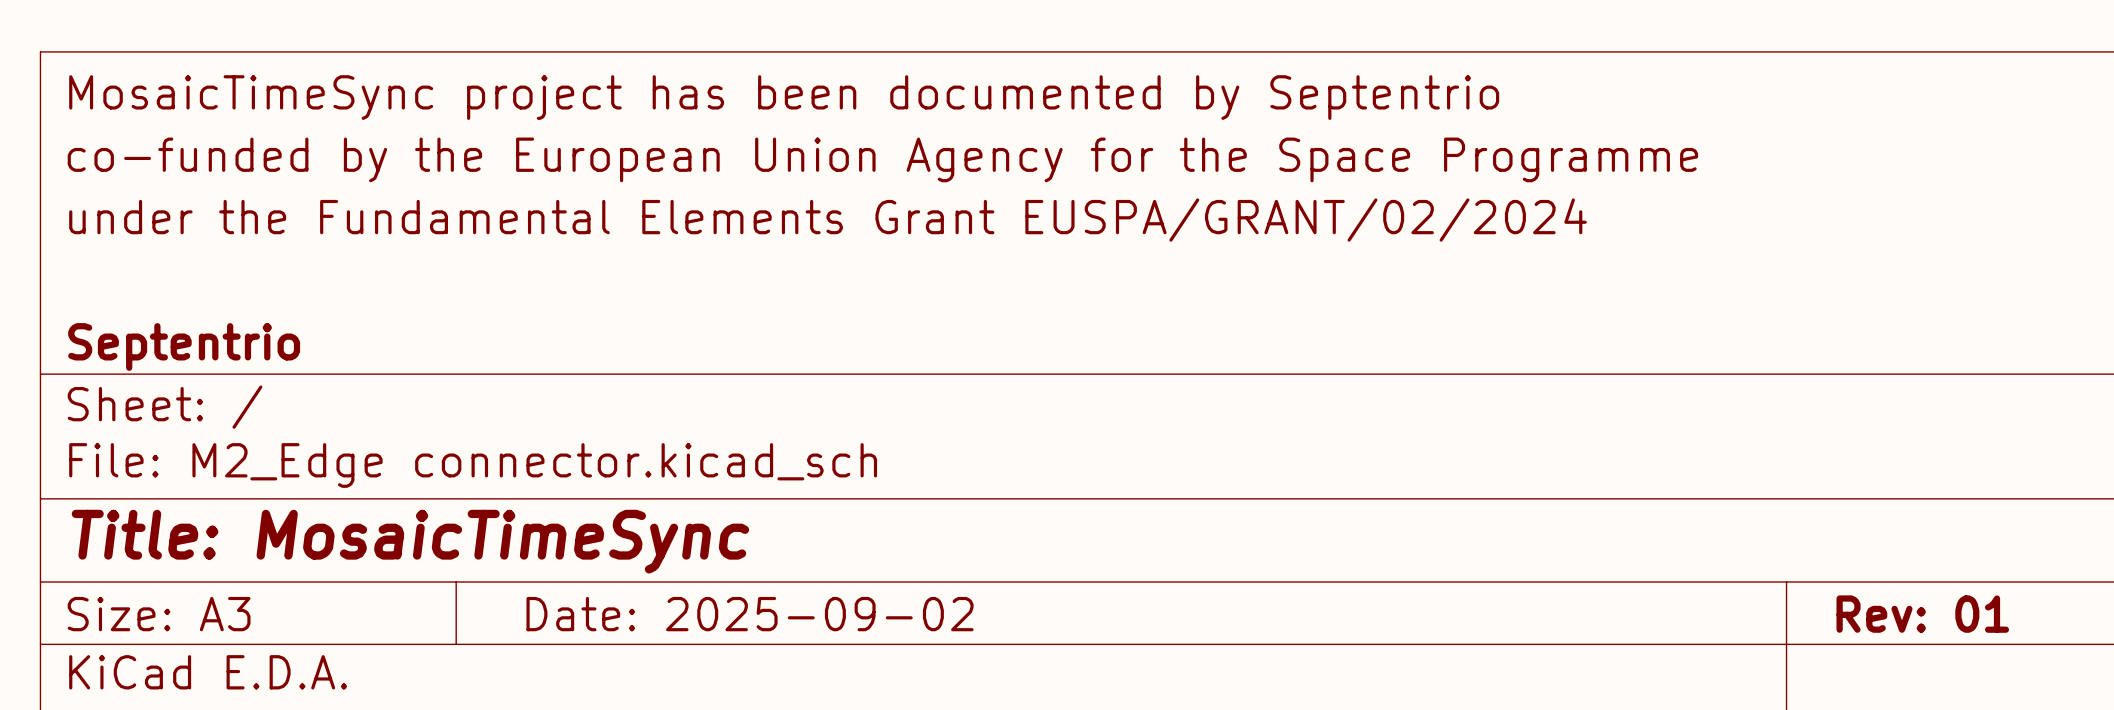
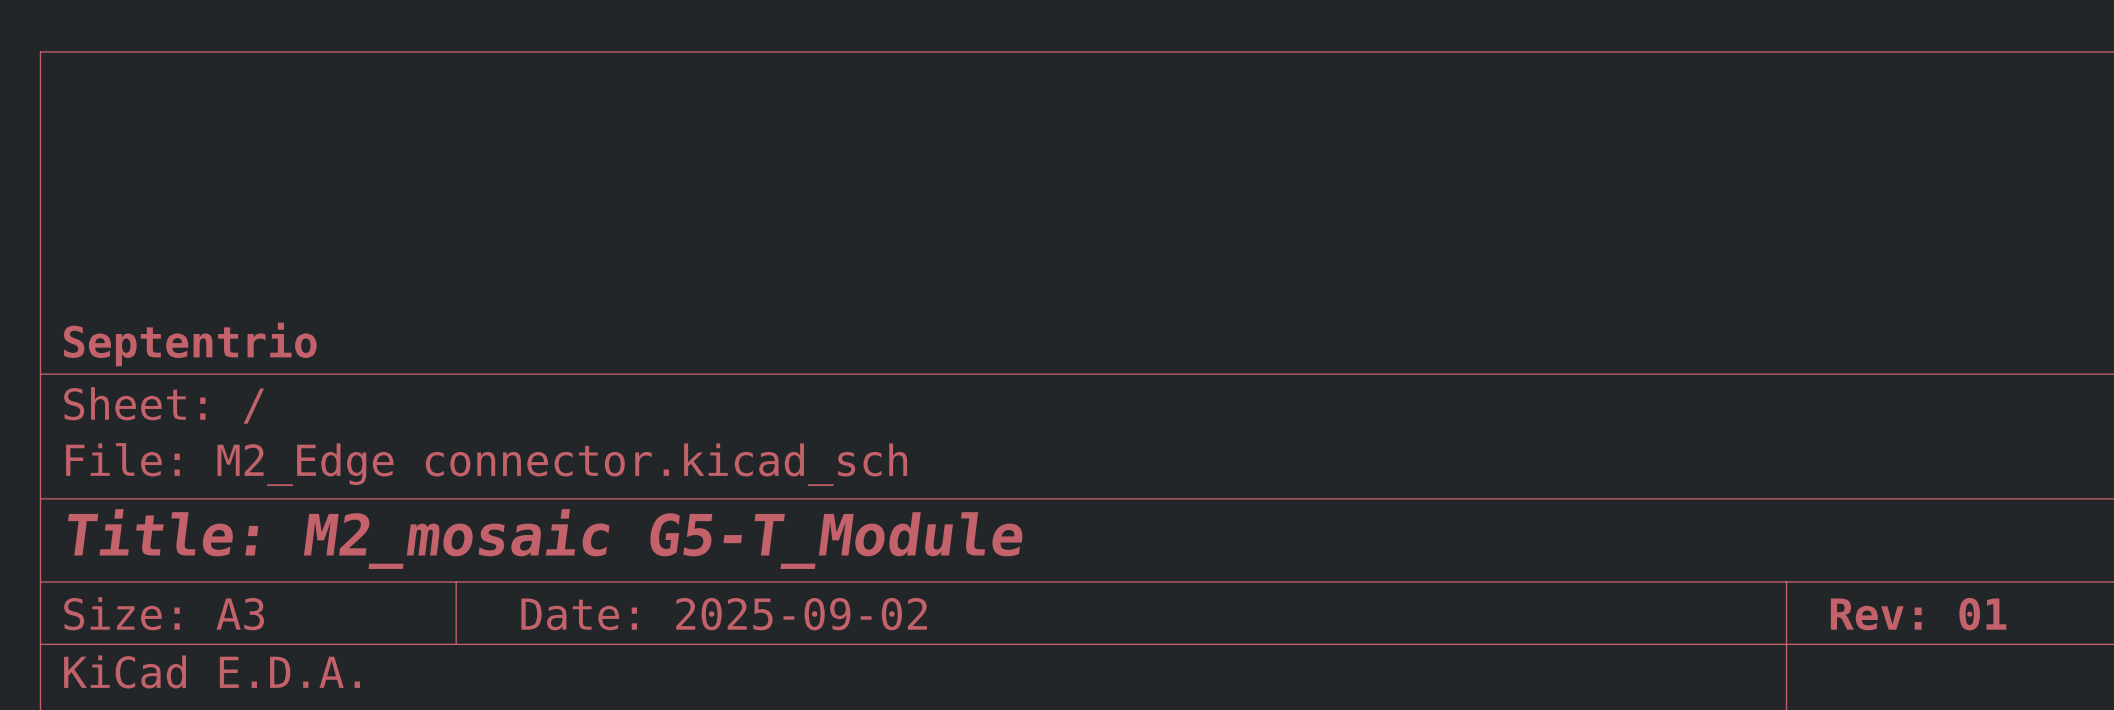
title block: MosaicTimeSync project has been documented by Septentrio (784, 97) -> none
title block: co-funded by the European Union Agency for the Space Programme (882, 159) -> none
title block: under the Fundamental Elements Grant EUSPA/GRANT/02/2024 (827, 220) -> none
title block: Title: MosaicTimeSync (410, 541) -> Title: M2_mosaic G5-T_Module (545, 539)

